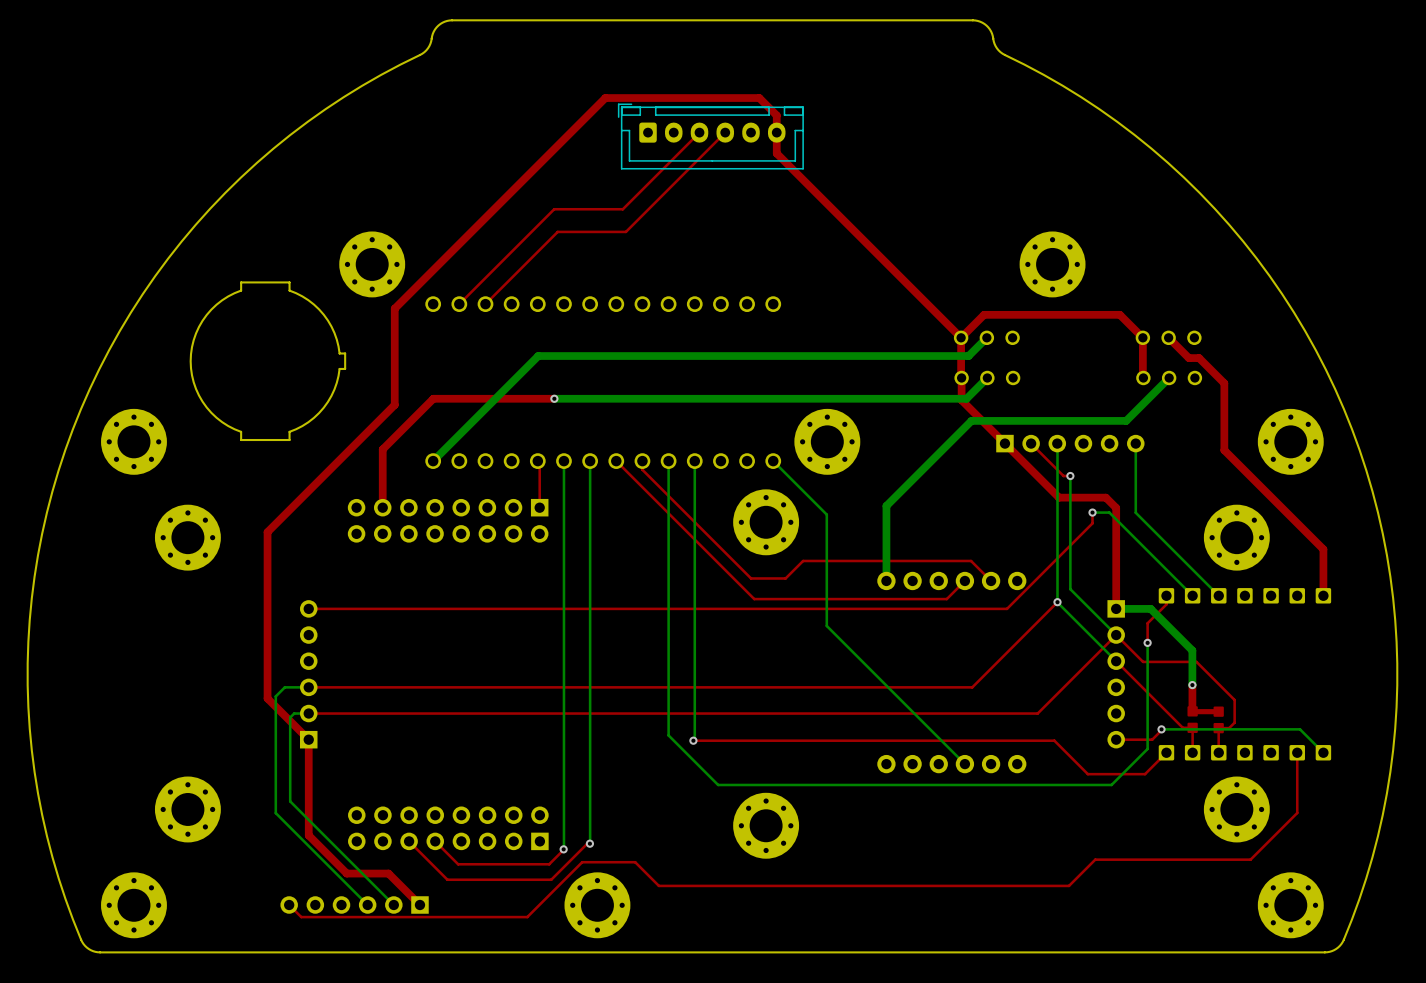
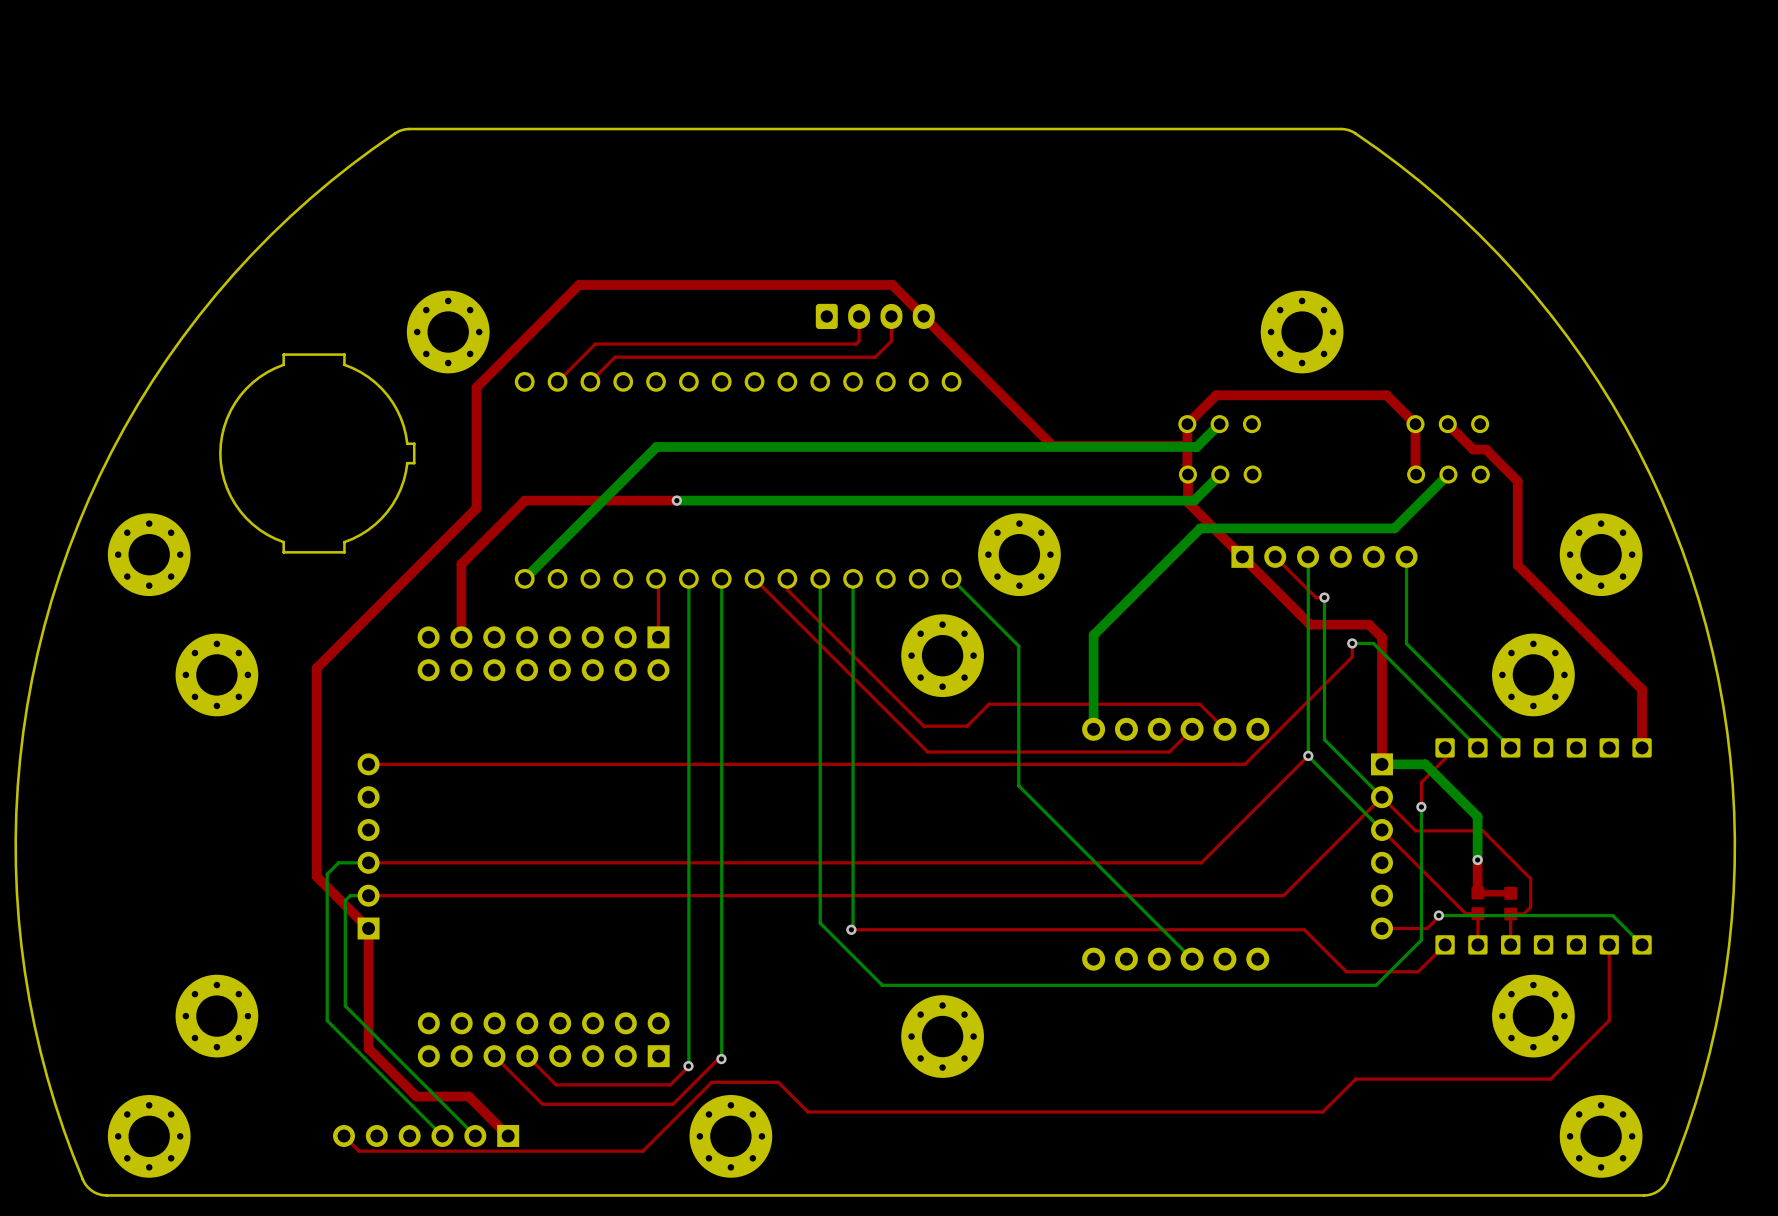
top track: (699, 132) (622, 209) (554, 209) (489, 274) -> (859, 316) (859, 341) (856, 344) (595, 344)
top track: (725, 132) (625, 231) (557, 231) (505, 284) -> (891, 316) (891, 341) (875, 357) (615, 357)
part: (710, 136) -> none
top track: (476, 226) (605, 98) (759, 98) (776, 115) (776, 153) (961, 337) -> (579, 284) (892, 284) (1052, 445) (1187, 445)
part: none -> (875, 316)
board edge: (1324, 952) (1334, 950) (1342, 941) (1359, 899) (1372, 857) (1390, 772) (1396, 707) (1396, 641) (1390, 576) (1377, 512) (1352, 429) (1325, 369) (1293, 312) (1256, 258) (1214, 208) (1184, 177) (1134, 134) (1062, 85) (1002, 53) (995, 46) (988, 27) (980, 21) (972, 20) (447, 20) (435, 29) (429, 46) (424, 52) (362, 85) (307, 121) (256, 162) (210, 208) (181, 241) (142, 294) (109, 350) (89, 389) (58, 470) (46, 512) (34, 576) (29, 620) (27, 685) (31, 750) (38, 793) (52, 857) (72, 919) (83, 943) (90, 950) (100, 952) -> (1643, 1195) (1658, 1191) (1666, 1182) (1695, 1103) (1709, 1052) (1721, 999) (1731, 919) (1734, 839) (1730, 758) (1718, 678) (1698, 600) (1672, 524) (1638, 451) (1612, 404) (1567, 337) (1517, 274) (1460, 216) (1420, 181) (1377, 148) (1353, 132) (1340, 129) (407, 129) (397, 132) (373, 148) (309, 198) (251, 254) (215, 294) (167, 359) (138, 404) (99, 475) (78, 524) (51, 600) (32, 678) (20, 758) (15, 839) (16, 892) (25, 973) (40, 1052) (55, 1103) (72, 1154) (87, 1187) (97, 1193) (106, 1195)

